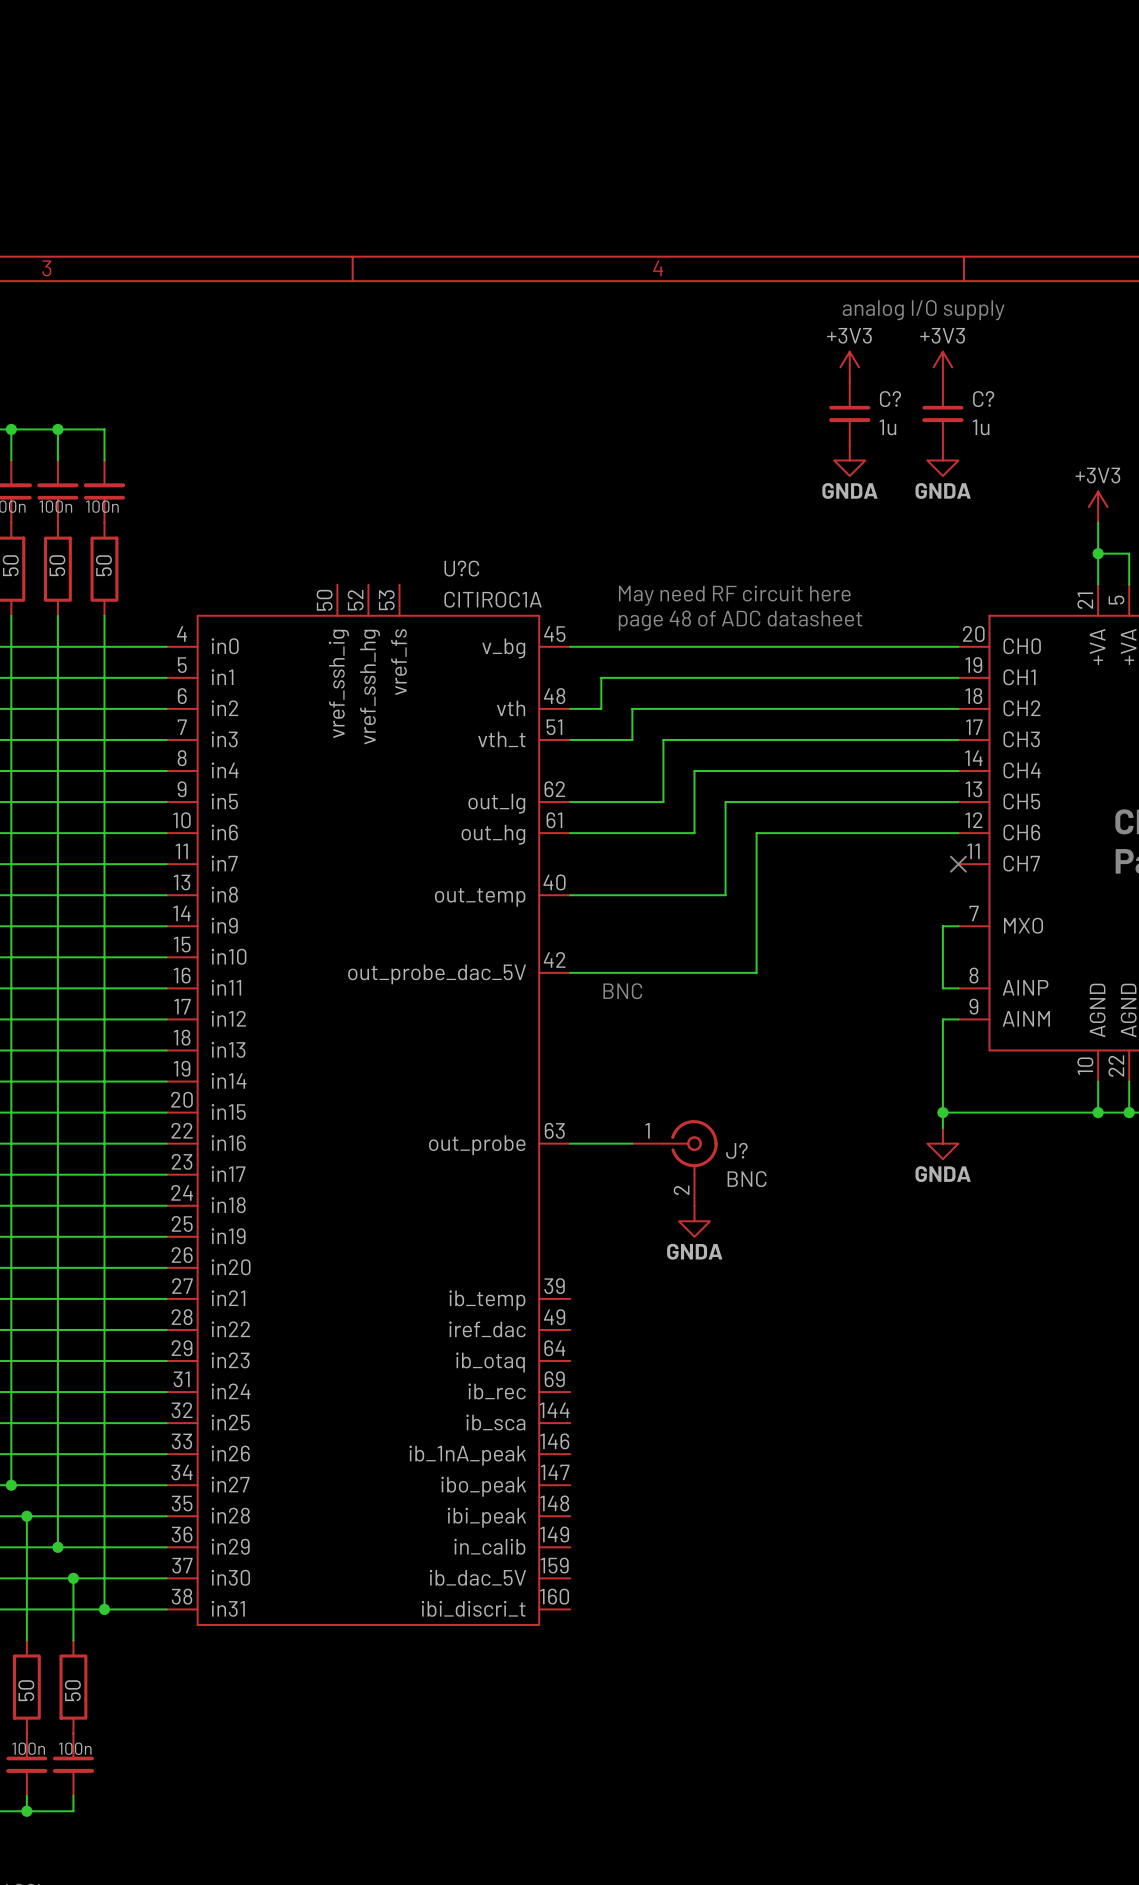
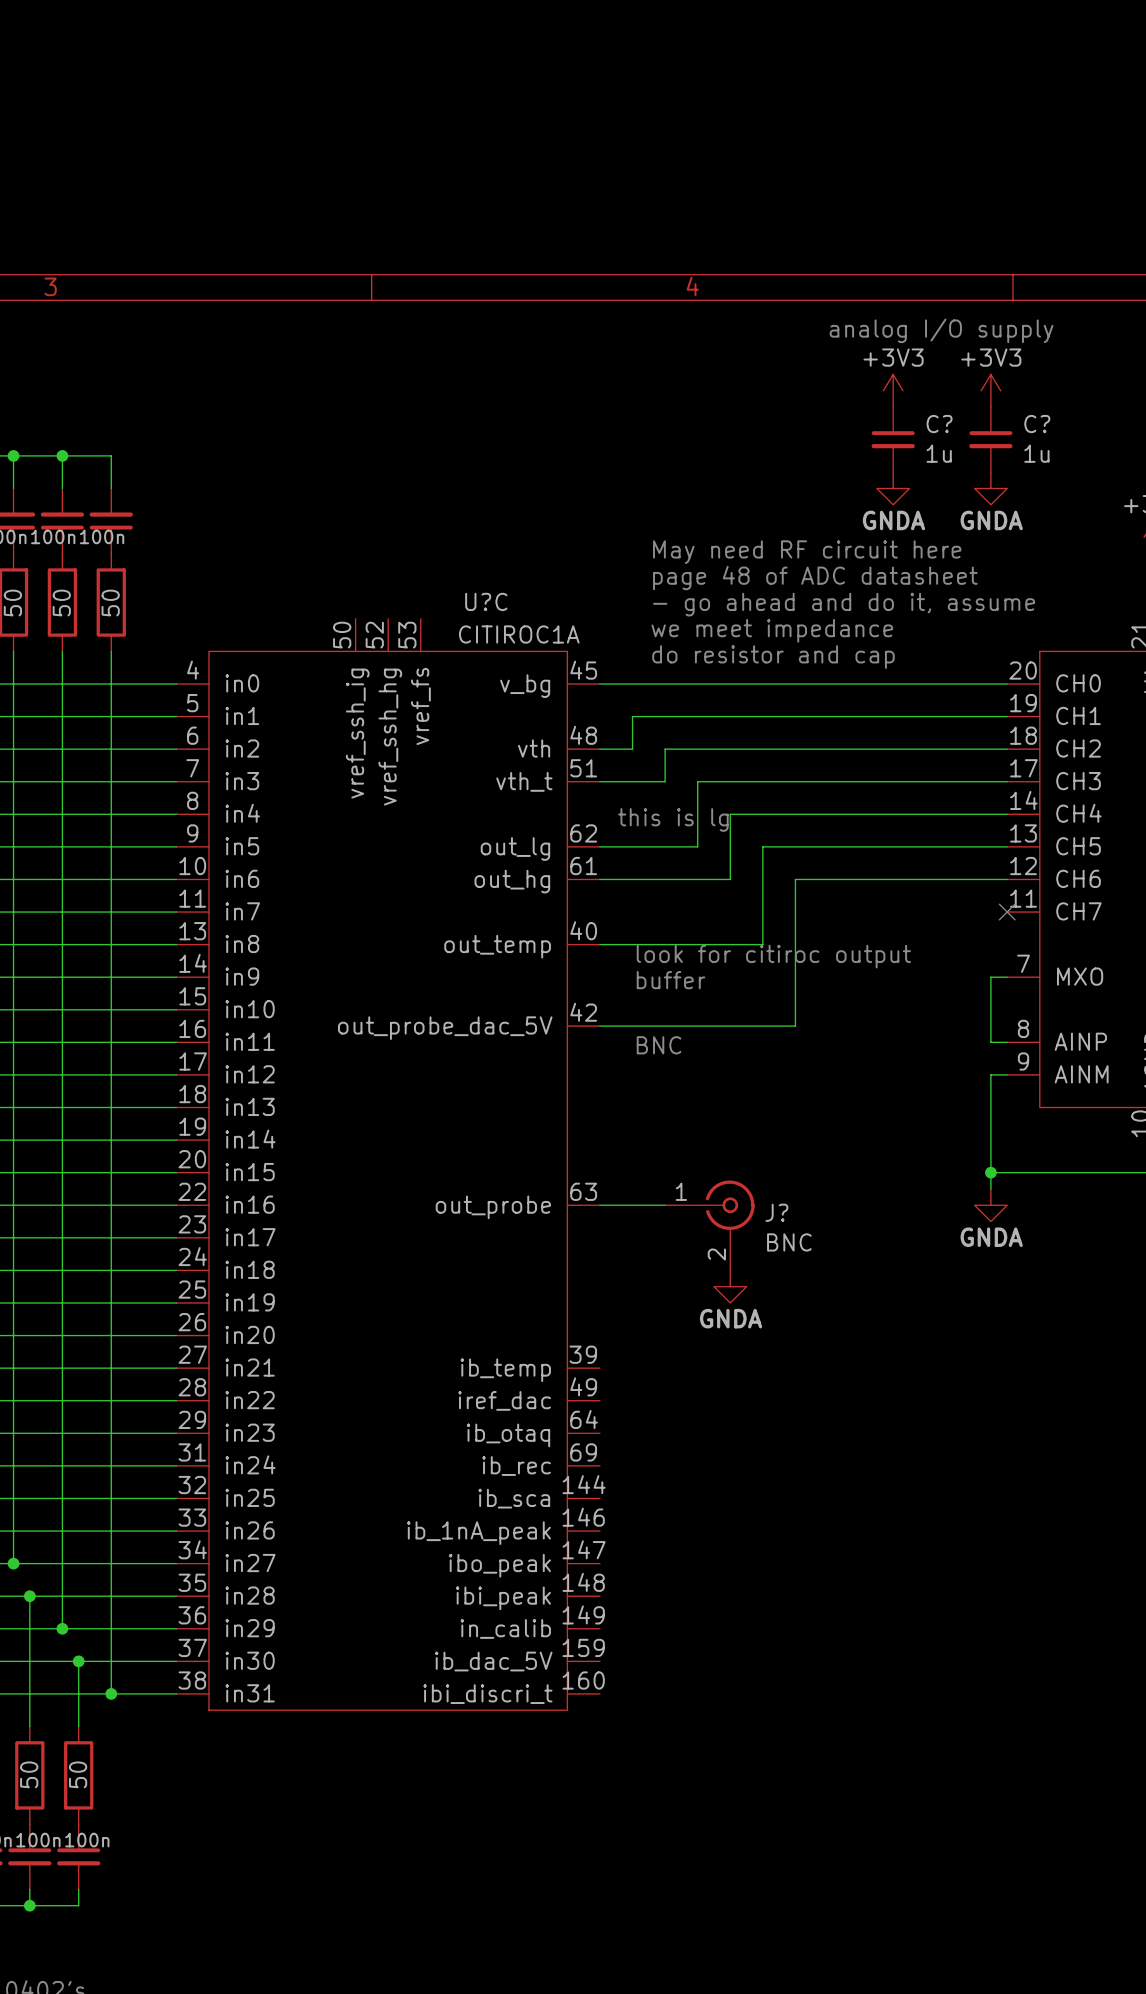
text: none -> May need RF circuit here (807, 552)
text: none -> page 48 of ADC datasheet (815, 577)
text: none -> - go ahead and do it, assume (844, 604)
text: May need RF circuit here (734, 595) -> we meet impedance (772, 630)
text: page 48 of ADC datasheet (740, 620) -> do resistor and cap (773, 657)
text: none -> this is lg (673, 819)
text: none -> look for citiroc output (773, 956)
text: none -> buffer (671, 980)

